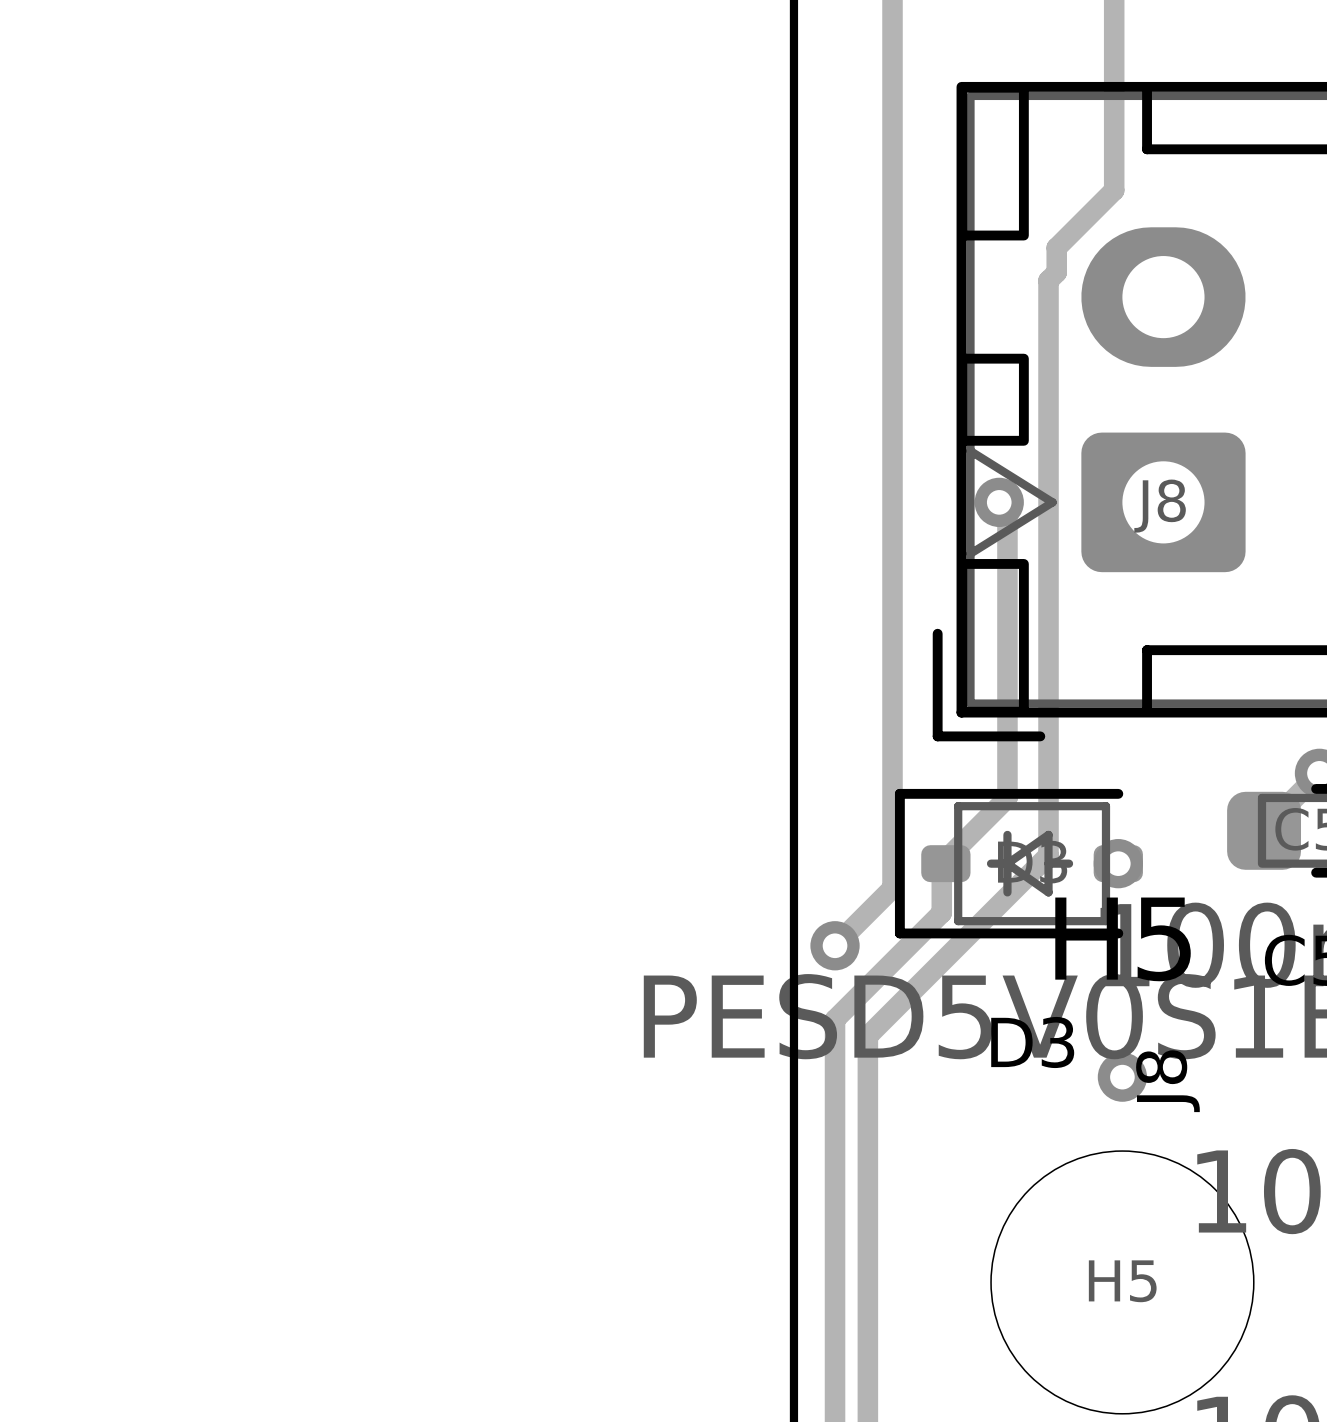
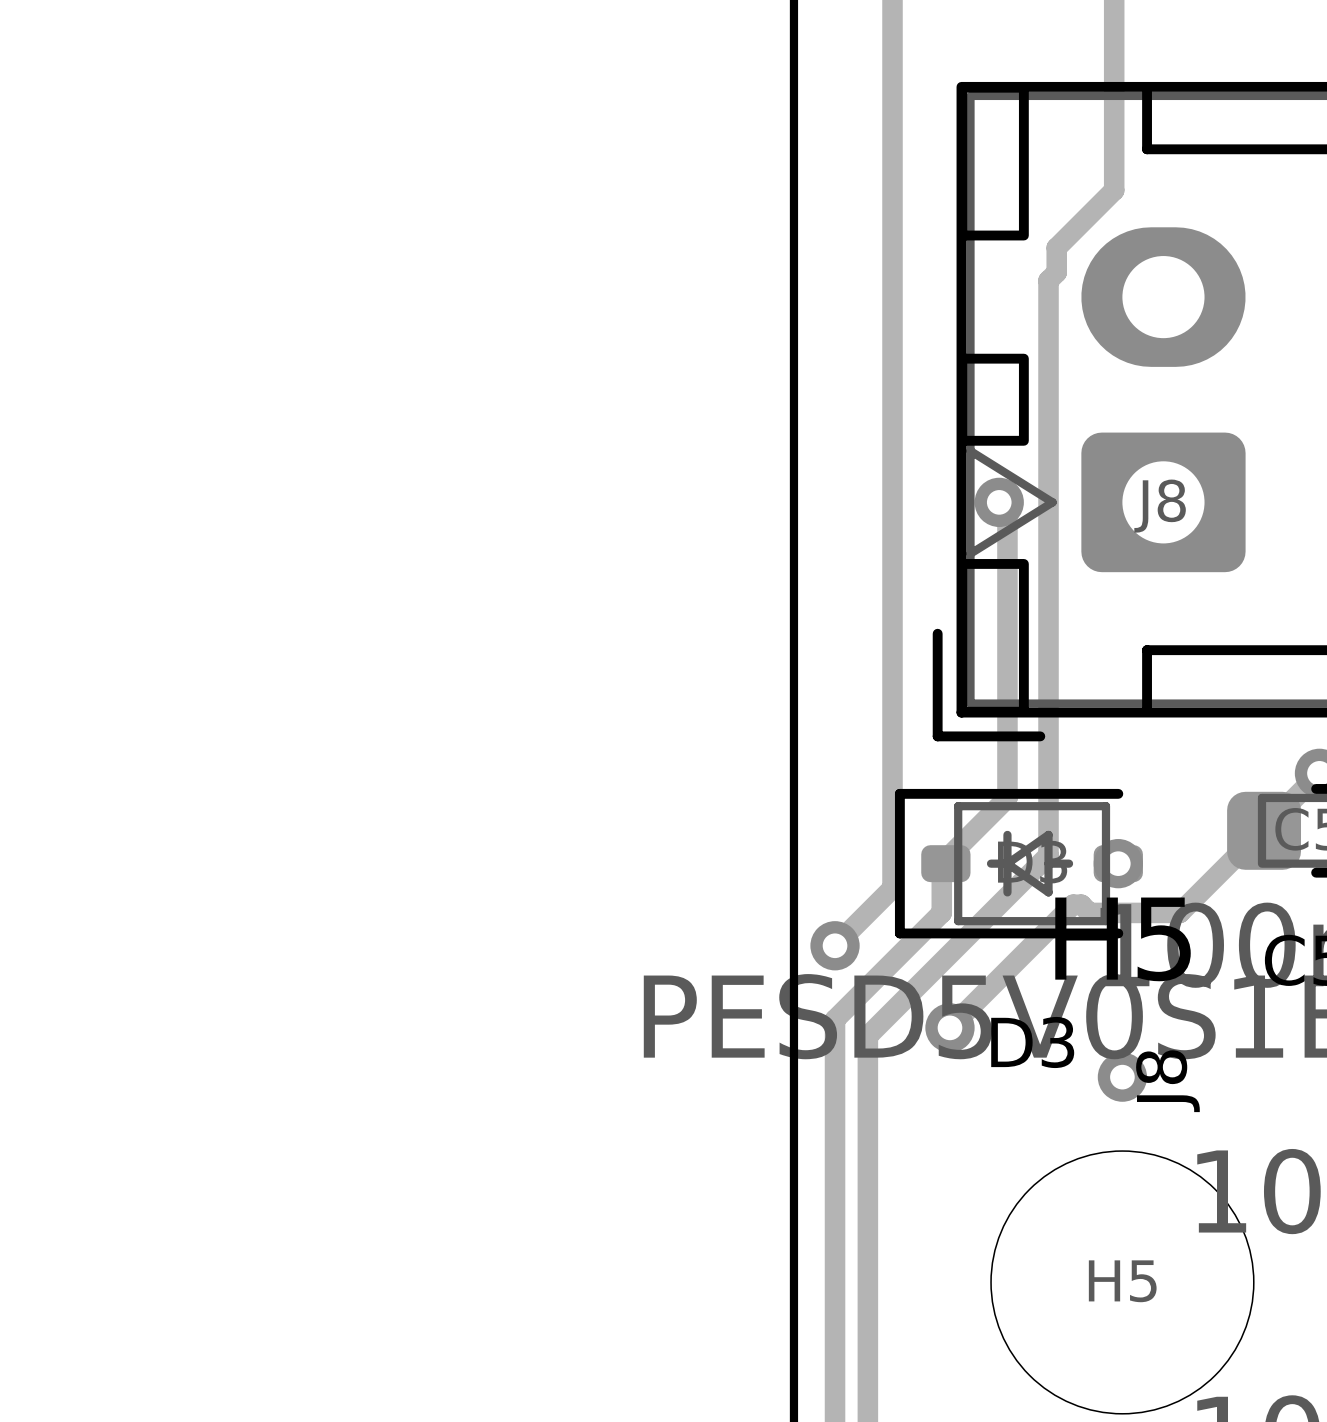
track: none -> (1262, 830) (1179, 912) (1089, 912) (1081, 904) (1073, 904) (949, 1027)
via: none -> (949, 1027)

